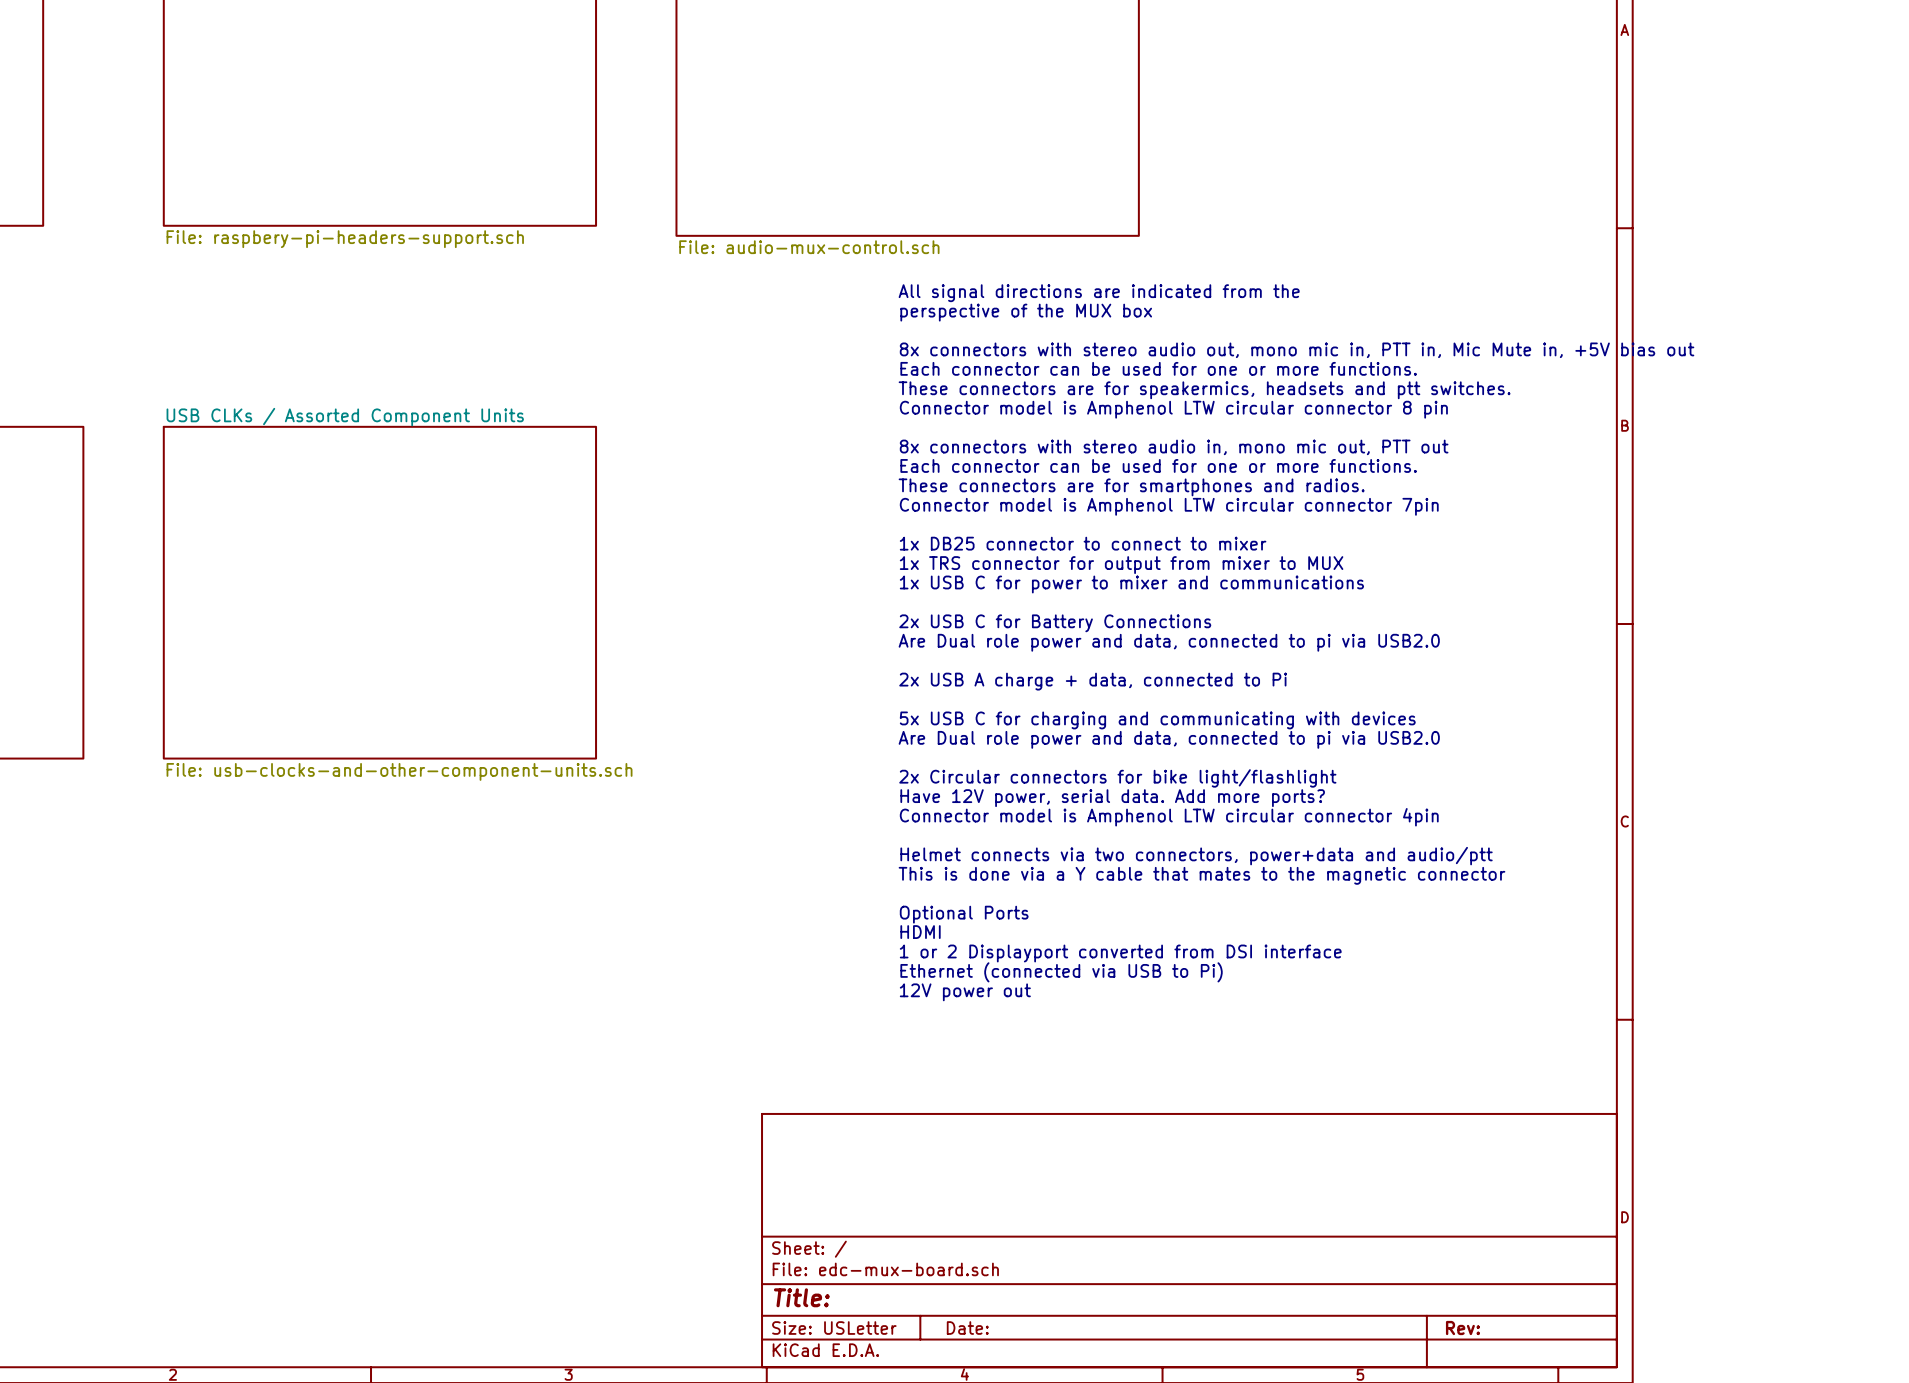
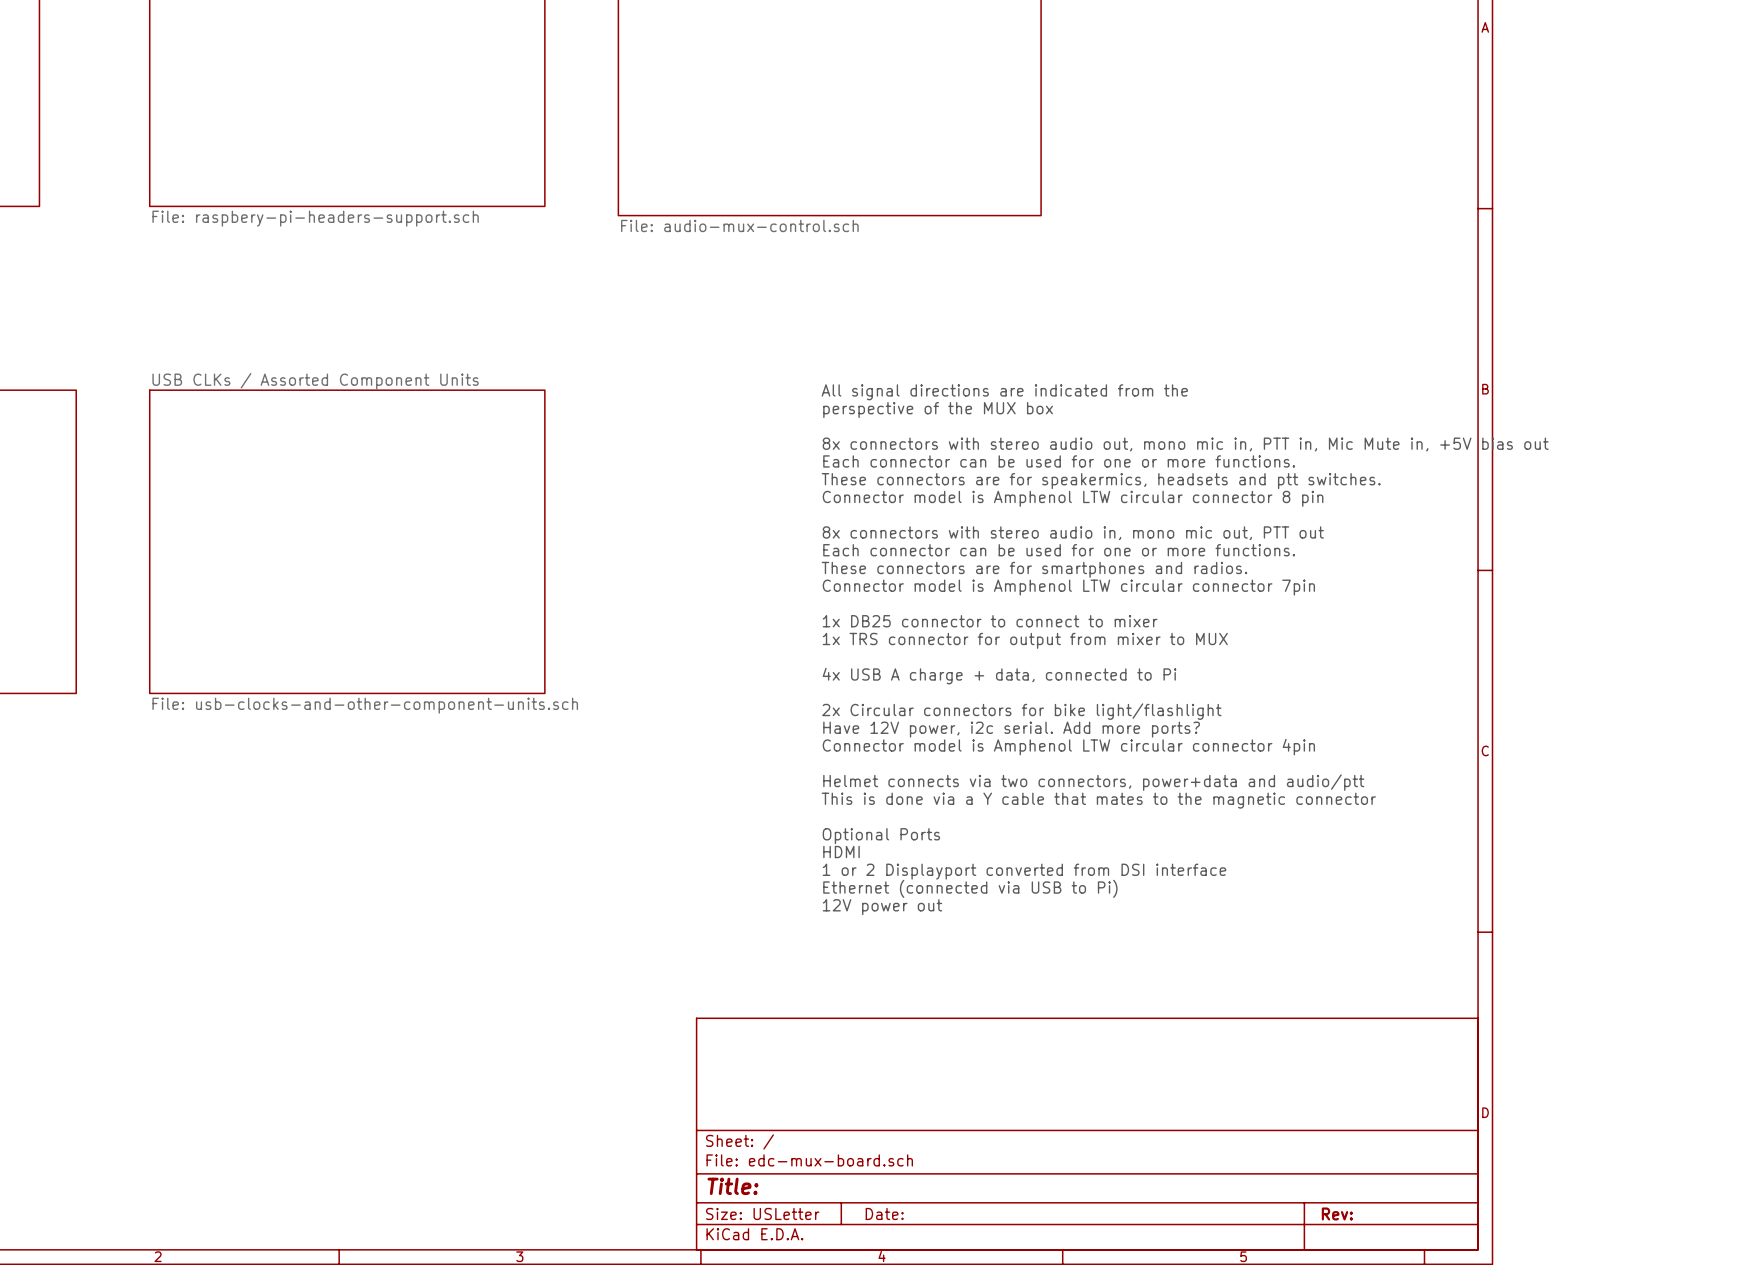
text position: All signal directions are indicated from the (1099, 293) -> All signal directions are indicated from the (1004, 392)
text: perspective of the MUX box (1026, 312) -> none
text: 8x connectors with stereo audio out, mono mic in, PTT in, Mic Mute in, +5V bias out (1297, 350) -> none
text: Each connector can be used for one or more functions. (1158, 368) -> none
text position: These connectors are for speakermics, headsets and ptt switches. (1204, 390) -> These connectors are for speakermics, headsets and ptt switches. (1101, 481)
text: Connector model is Amphenol LTW circular connector 8 pin (1173, 409) -> none
text: 8x connectors with stereo audio in, mono mic out, PTT out (1174, 447) -> perspective of the MUX box (938, 410)
text: Each connector can be used for one or more functions. (1158, 465) -> none
text: These connectors are for smartphones and radios. (1131, 487) -> 8x connectors with stereo audio out, mono mic in, PTT in, Mic Mute in, +5V bias out (1185, 444)
text: Connector model is Amphenol LTW circular connector 7pin (1169, 506) -> Each connector can be used for one or more functions. (1059, 461)
text: 1x DB25 connector to connect to mixer (1083, 543) -> Connector model is Amphenol LTW circular connector 8 pin (1073, 498)
text position: 1x TRS connector for output from mixer to MUX (1121, 565) -> 1x TRS connector for output from mixer to MUX (1025, 640)
text: 1x USB C for power to mixer and communications (1131, 584) -> 8x connectors with stereo audio in, mono mic out, PTT out (1073, 533)
text: none -> Each connector can be used for one or more functions. (1059, 550)
text: 2x USB C for Battery Connections (1055, 623) -> These connectors are for smartphones and radios. (1034, 569)
text: Are Dual role power and data, connected to pi via USB2.0 (1169, 642) -> Connector model is Amphenol LTW circular connector 7pin (1068, 587)
text: 2x USB A charge + data, connected to Pi (1093, 681) -> 1x DB25 connector to connect to mixer (990, 621)
text: 5x USB C for charging and communicating with devices (1157, 720) -> none
text: Are Dual role power and data, connected to pi via USB2.0 (1169, 739) -> 4x USB A charge + data, connected to Pi (999, 676)
text: Have 12V power, serial data. Add more ports? (1112, 798) -> Have 12V power, i2c serial. Add more ports? (1011, 729)

